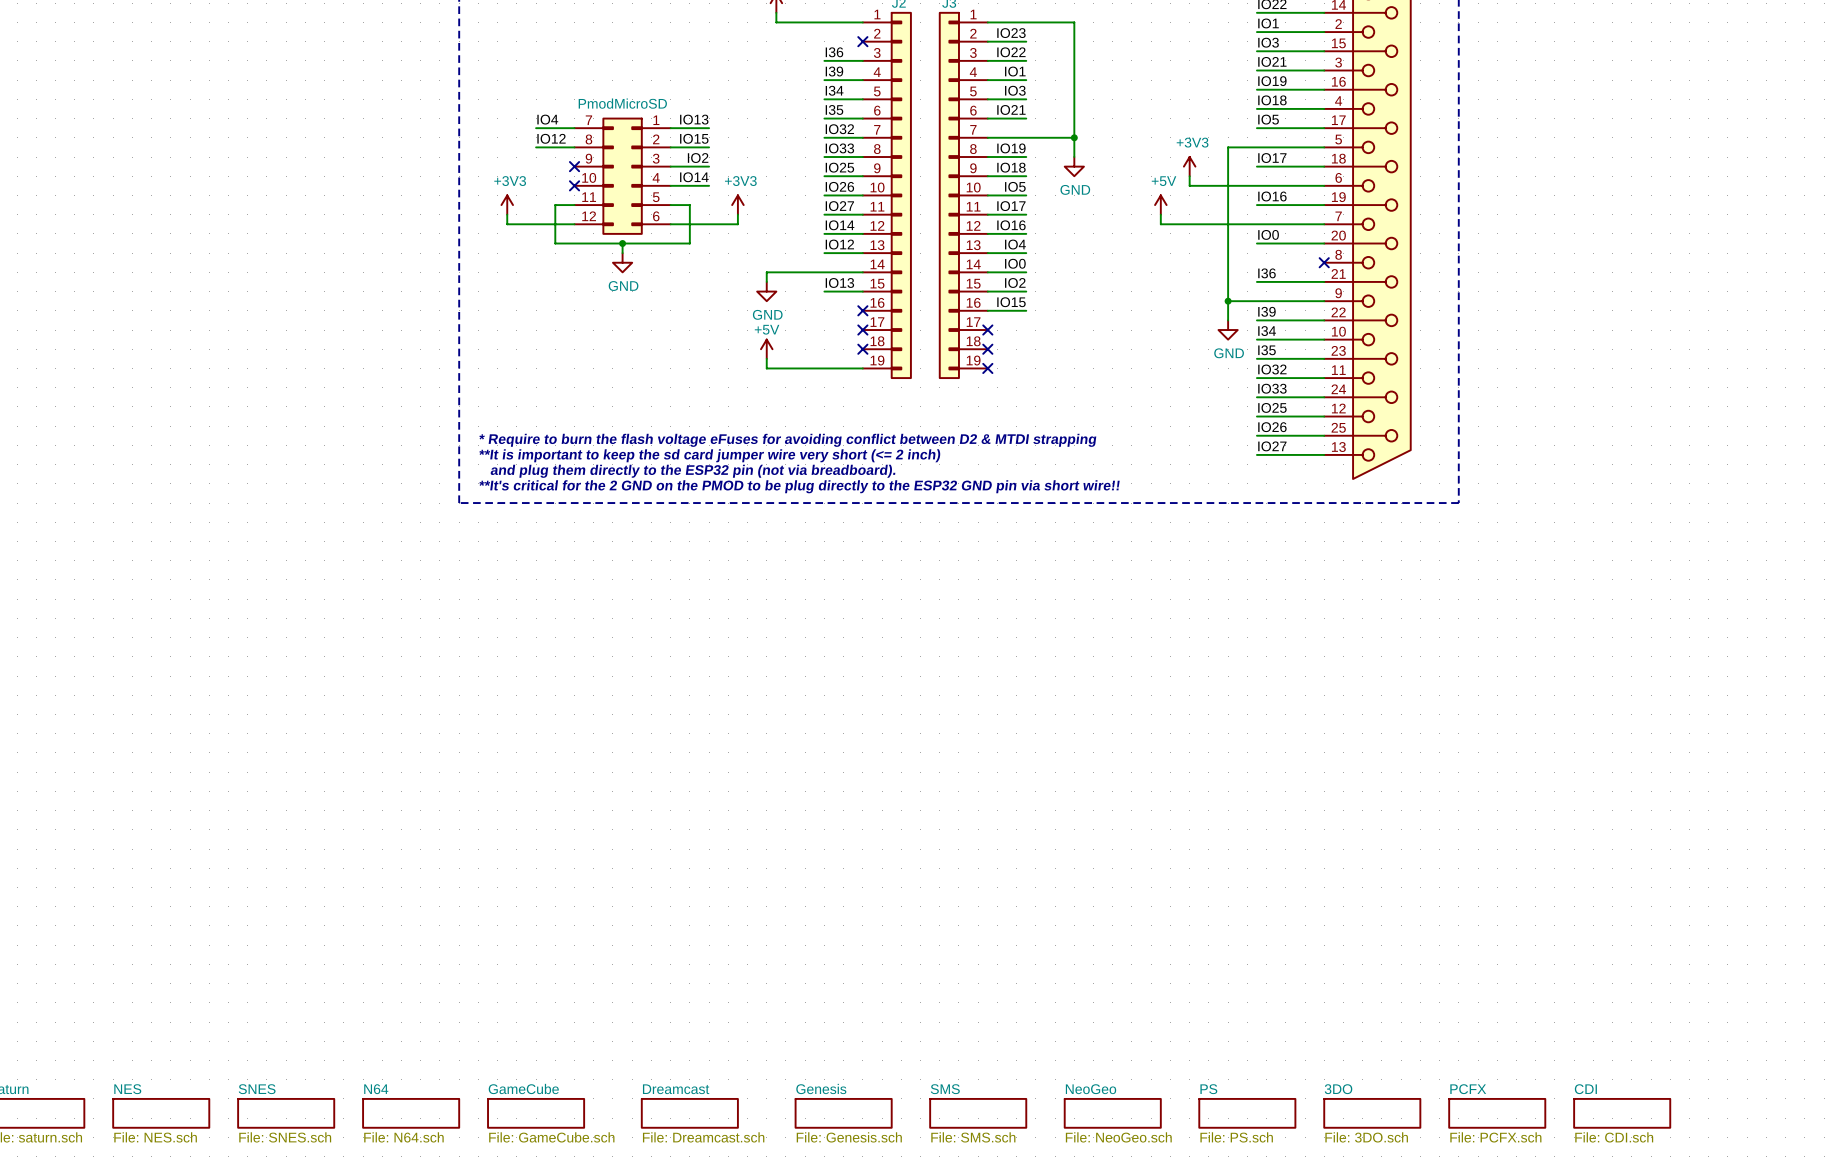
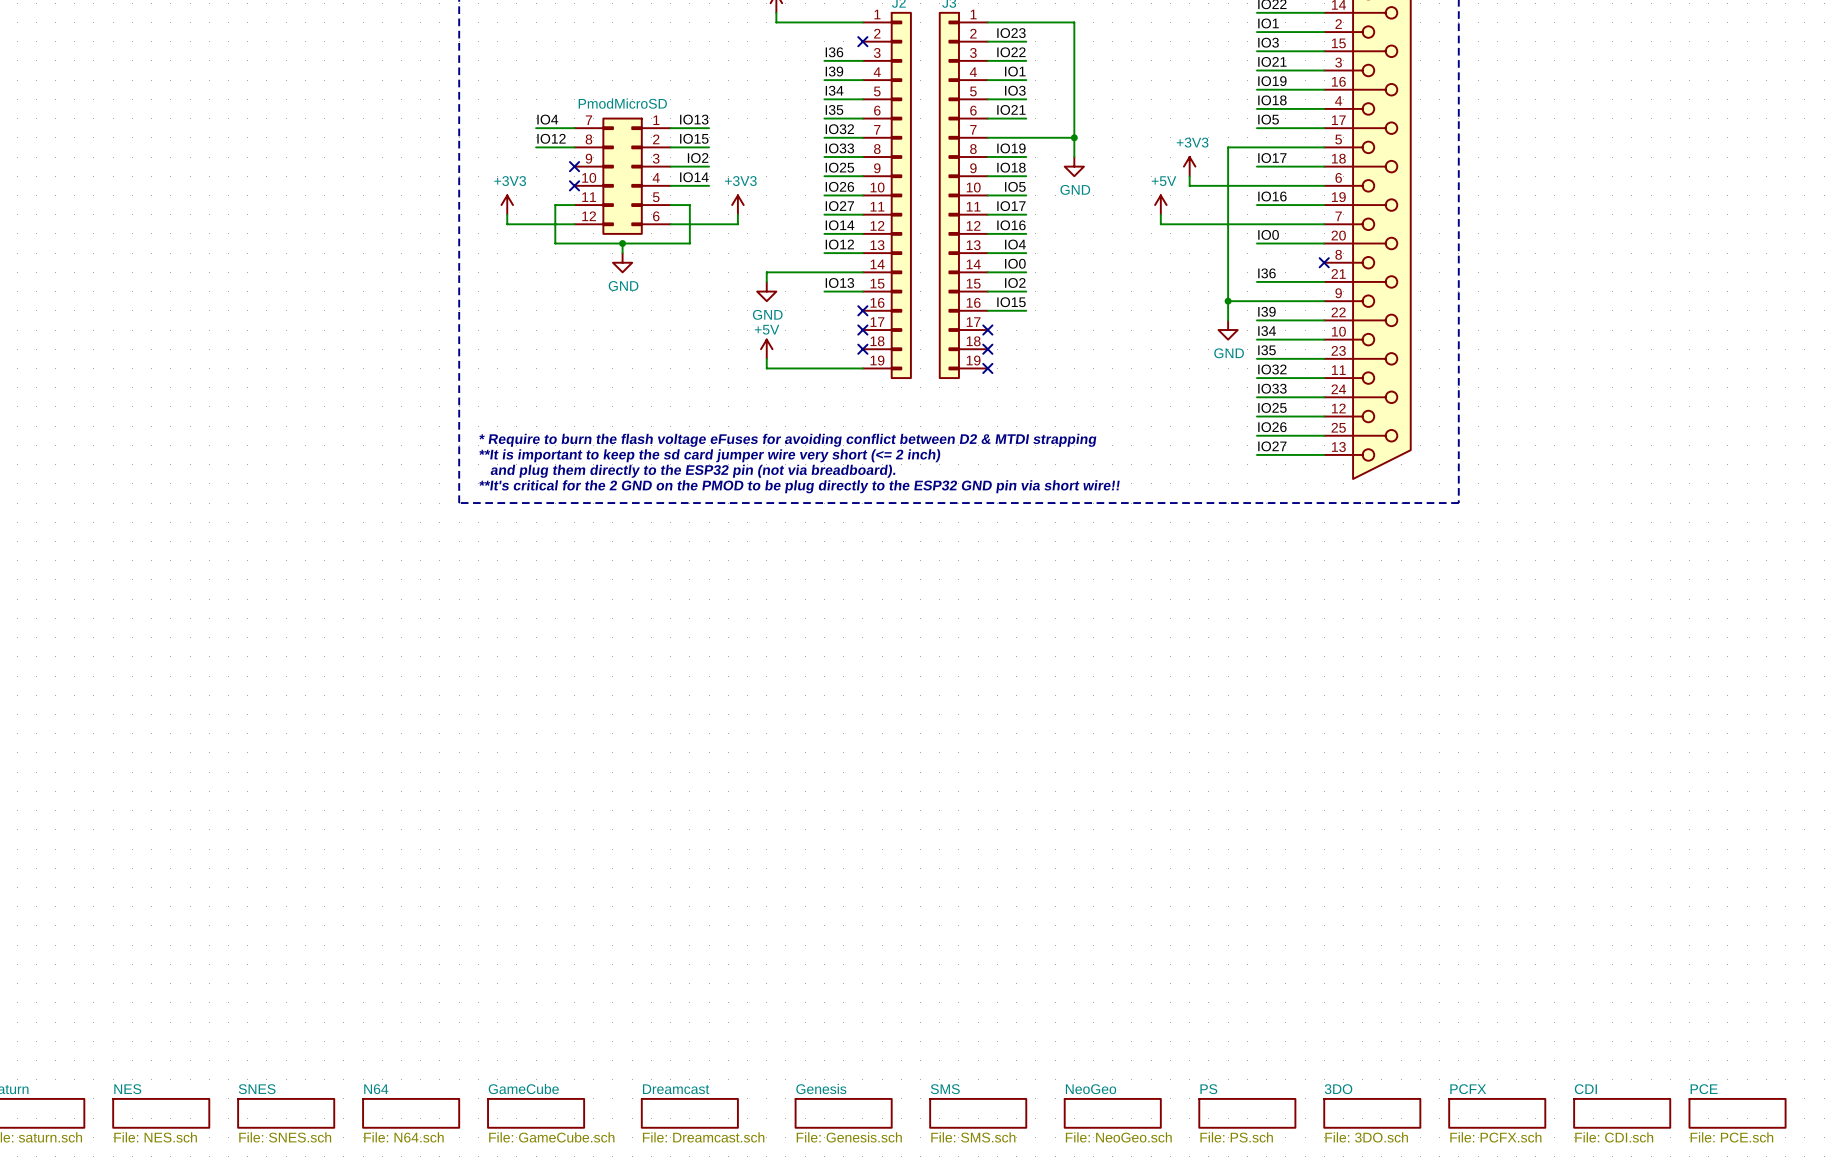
sheet PCE: none -> File: PCE.sch (1737, 1113)

